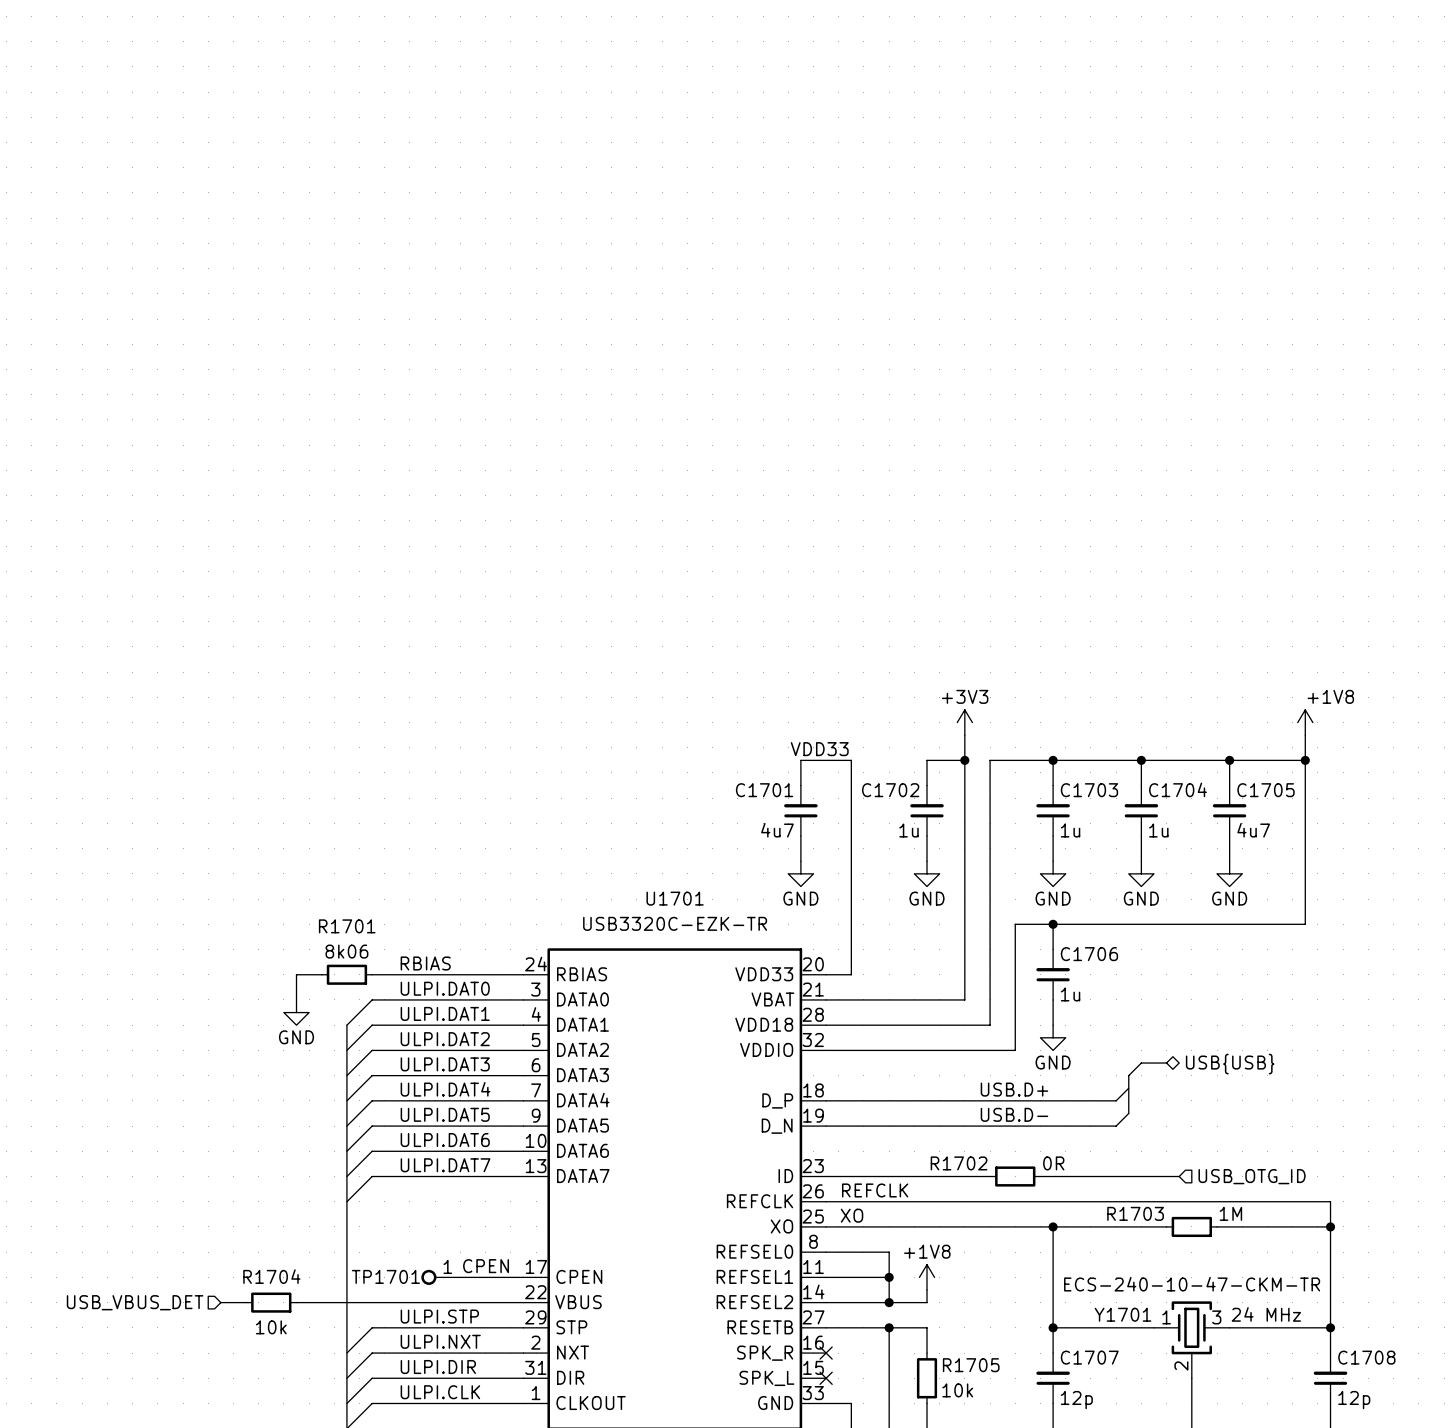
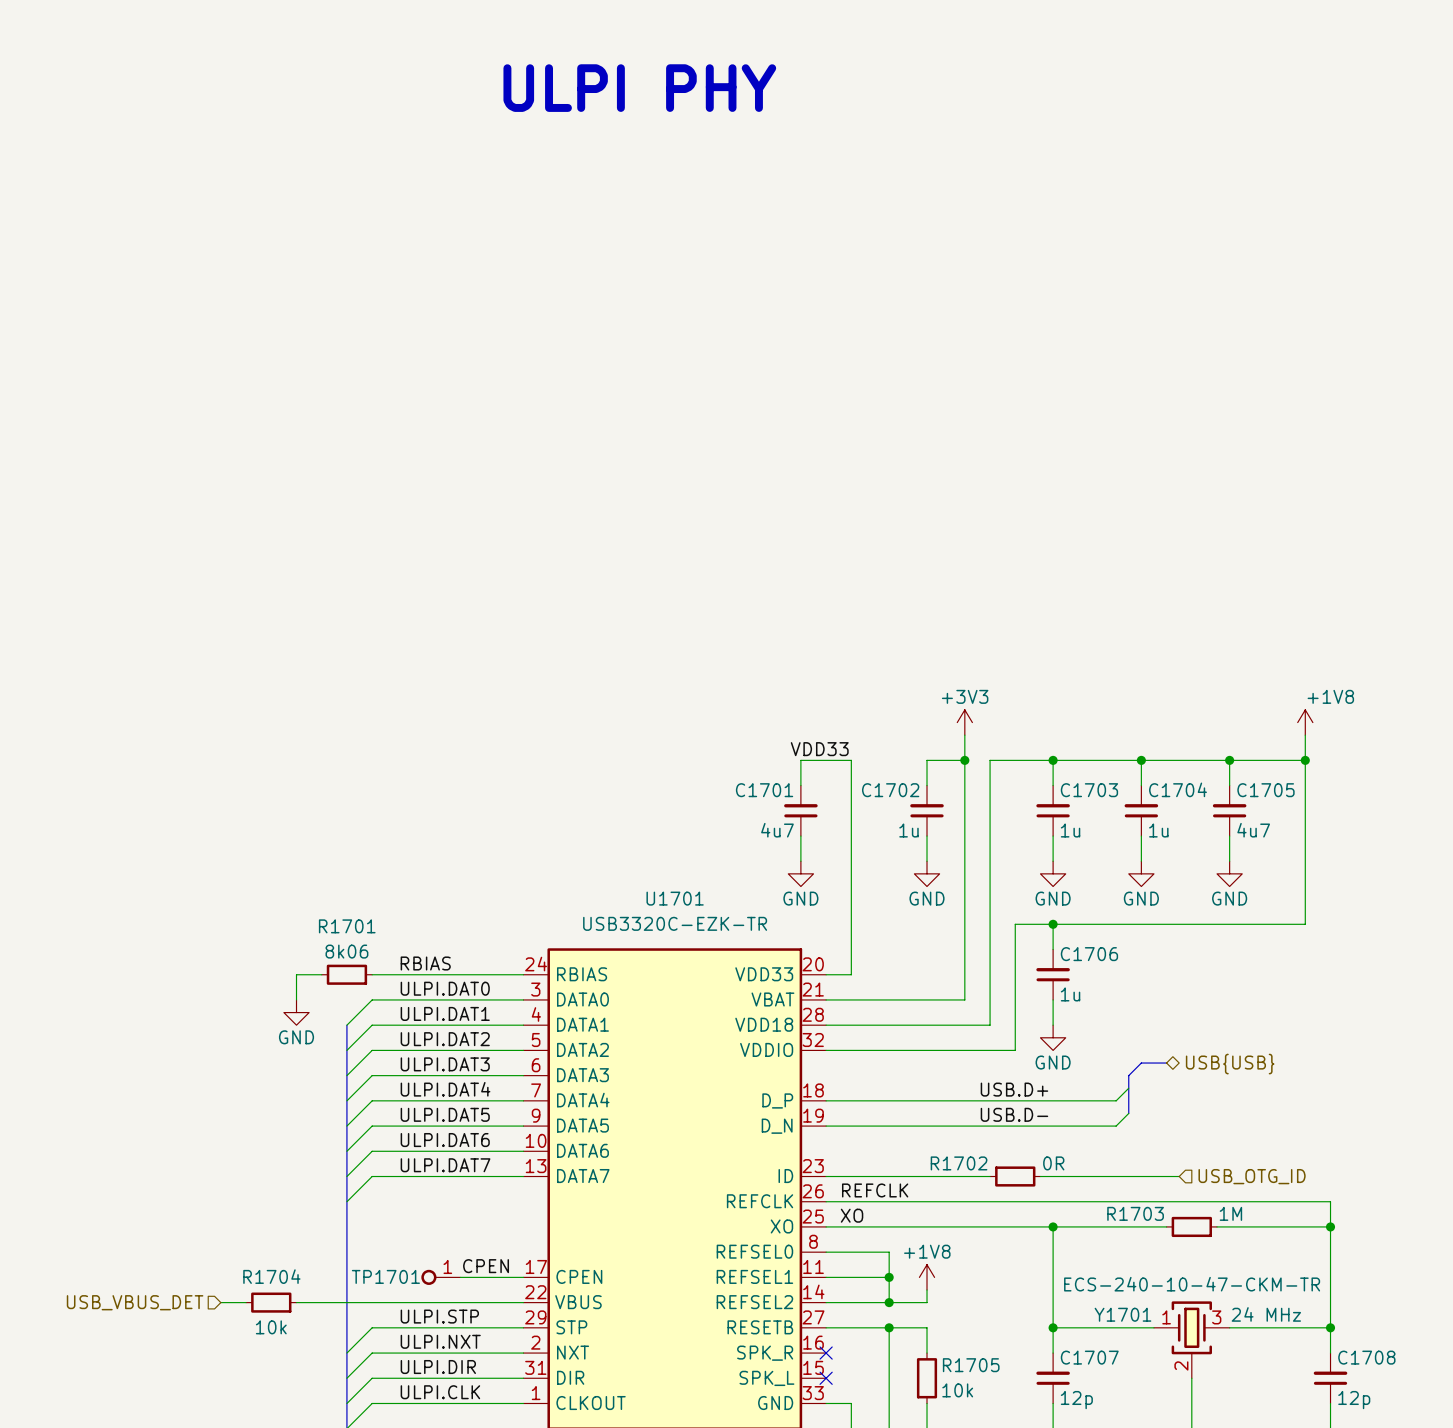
text: none -> ULPI PHY (639, 88)

